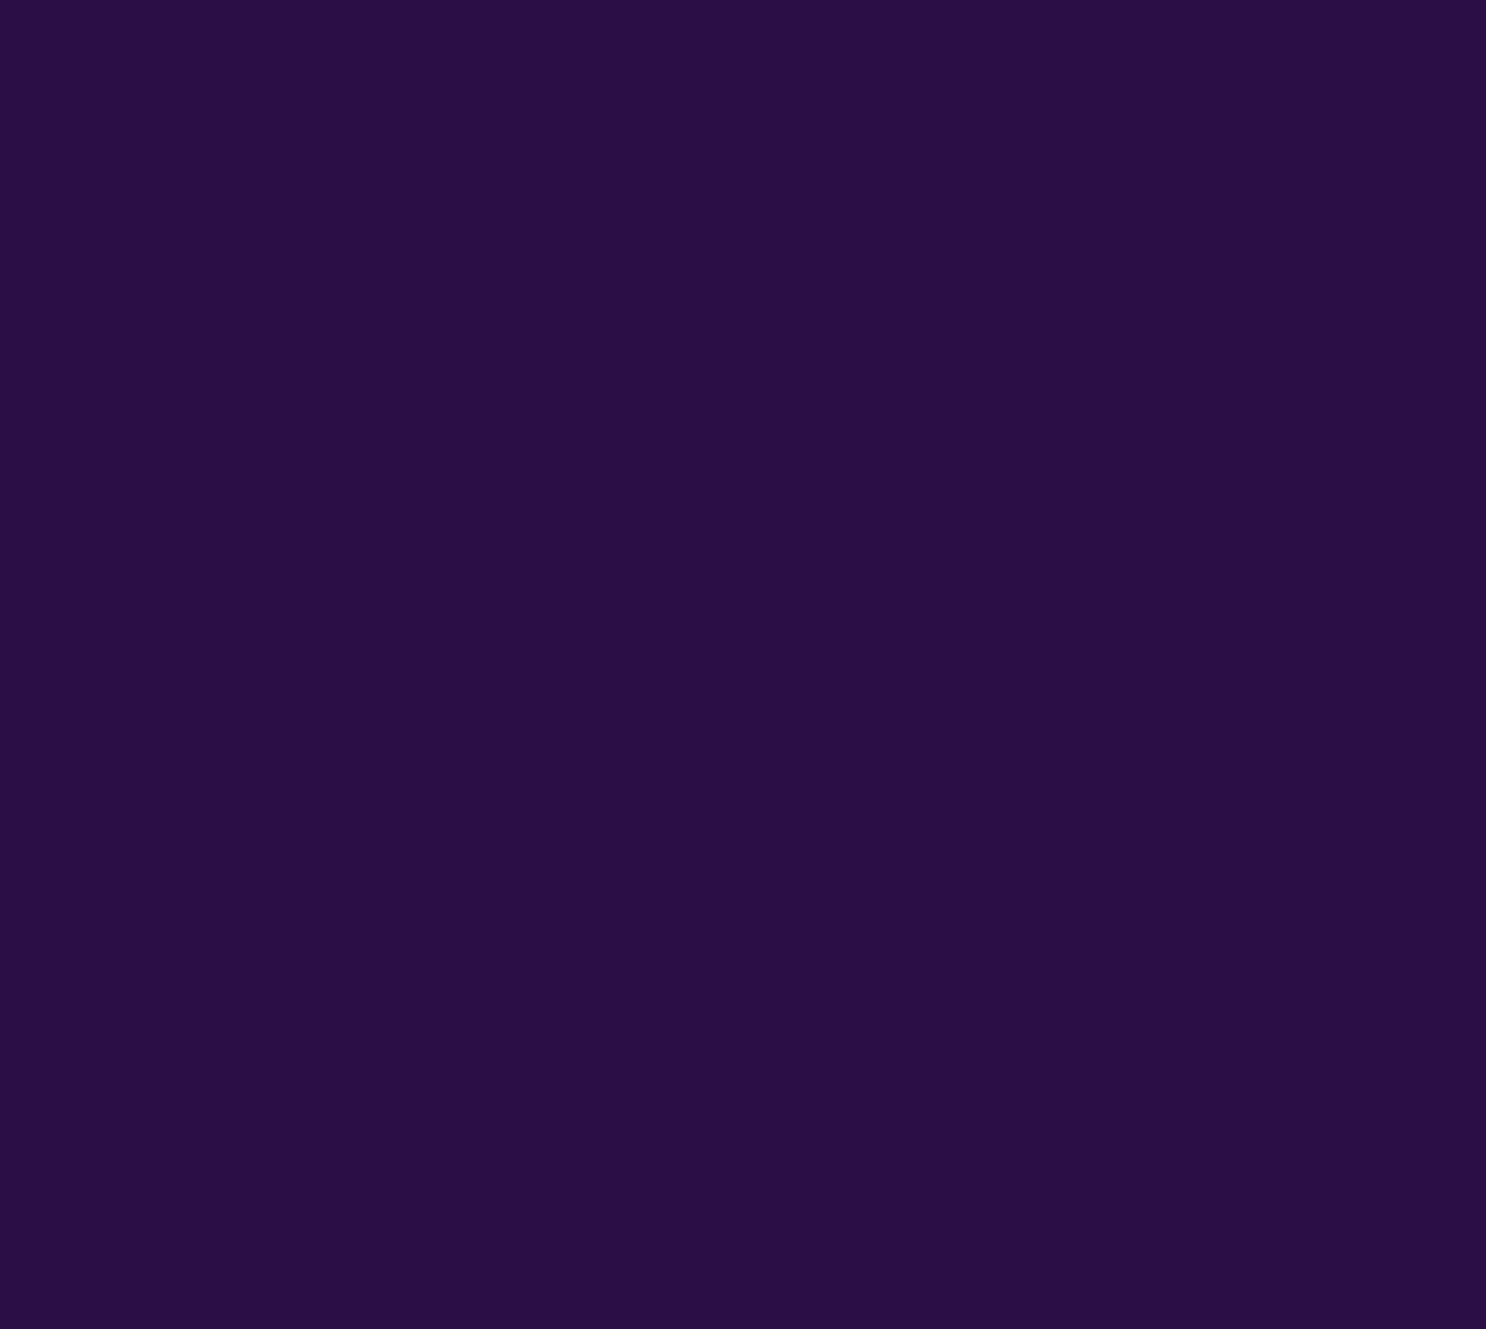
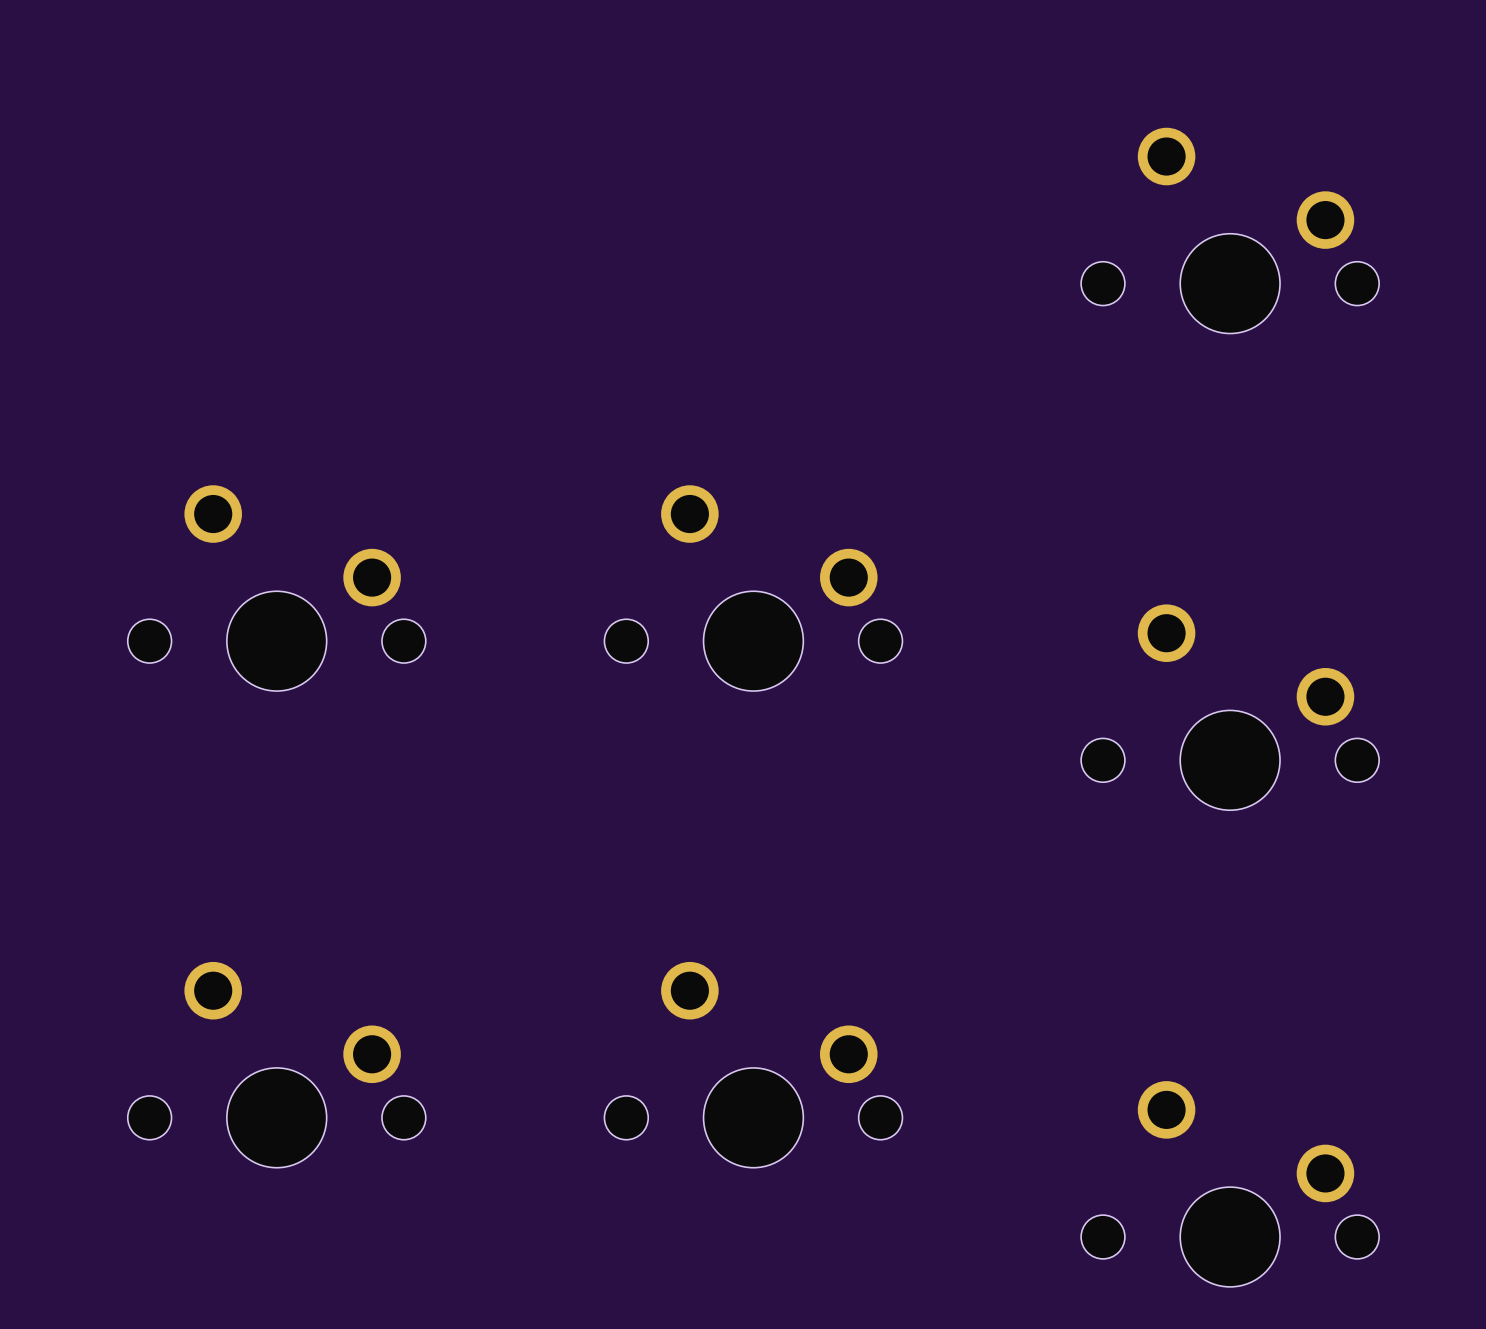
part: none -> (1230, 230)
part: none -> (276, 588)
part: none -> (753, 588)
part: none -> (1230, 707)
part: none -> (276, 1064)
part: none -> (753, 1064)
part: none -> (1230, 1184)

